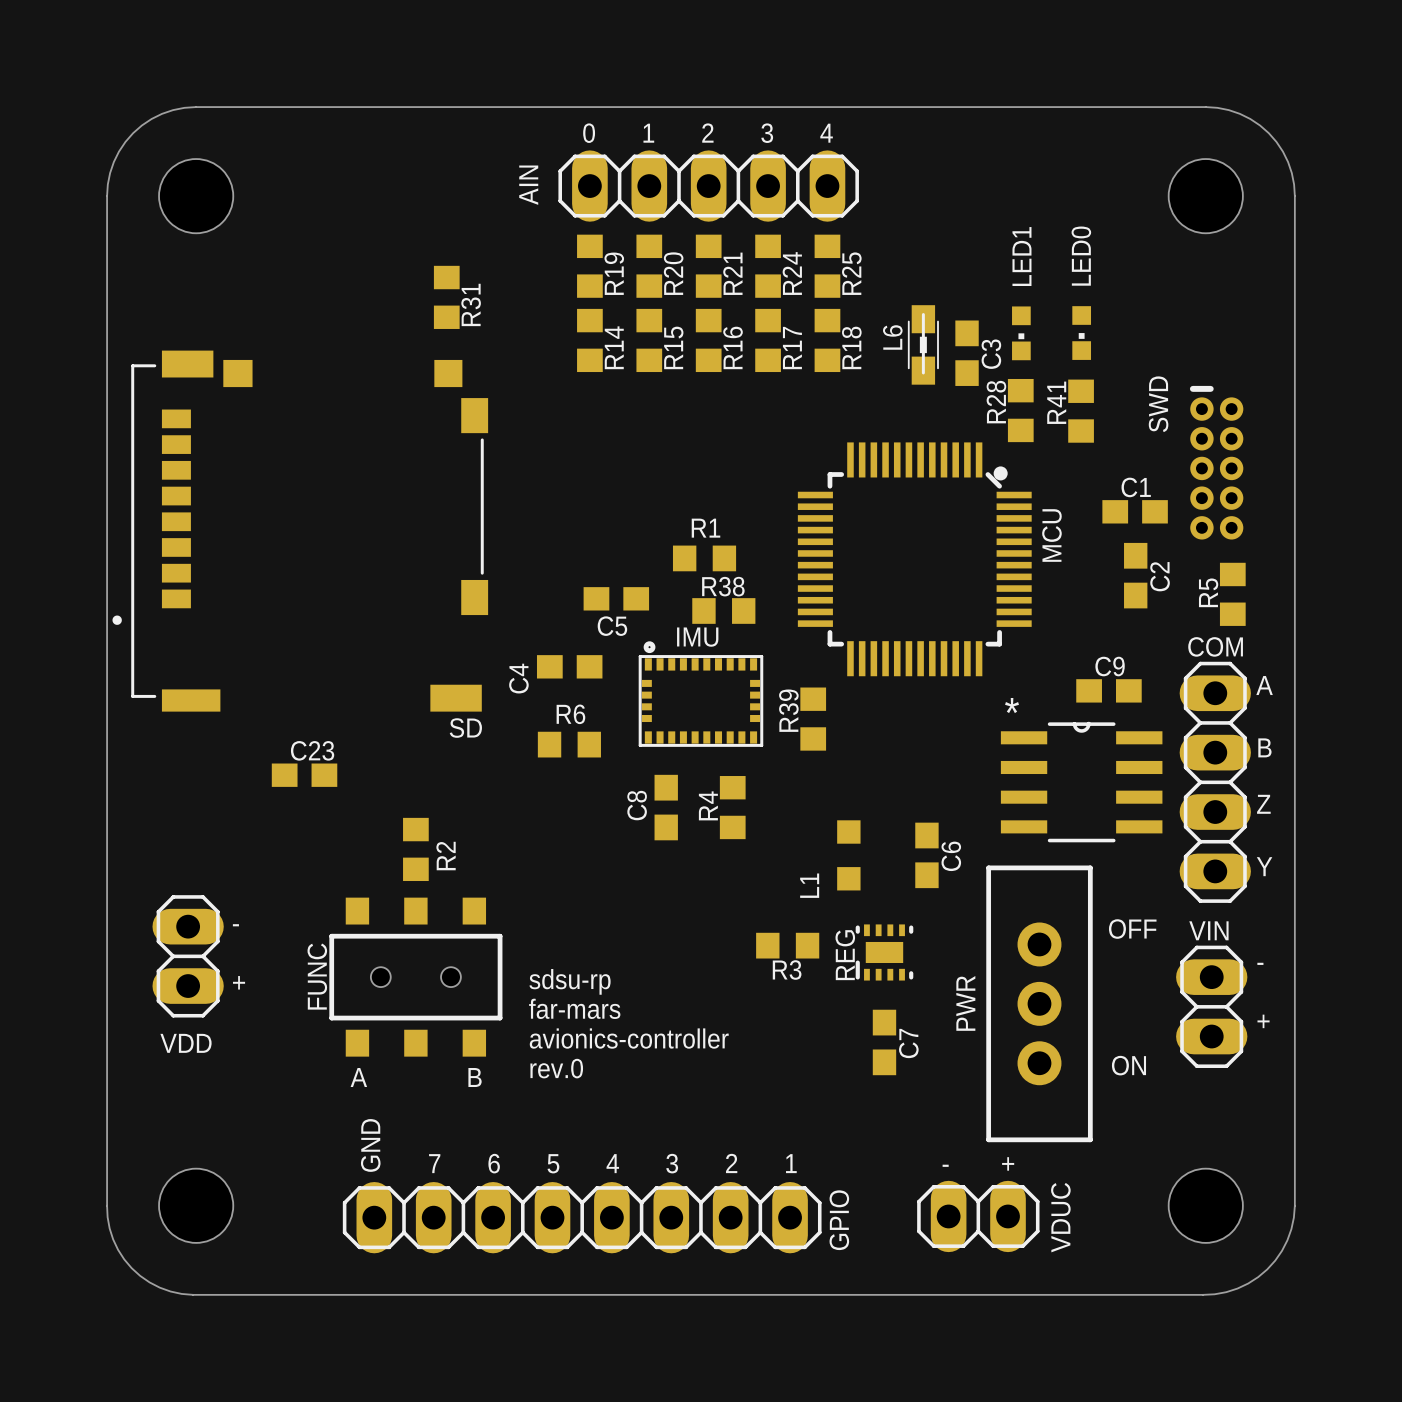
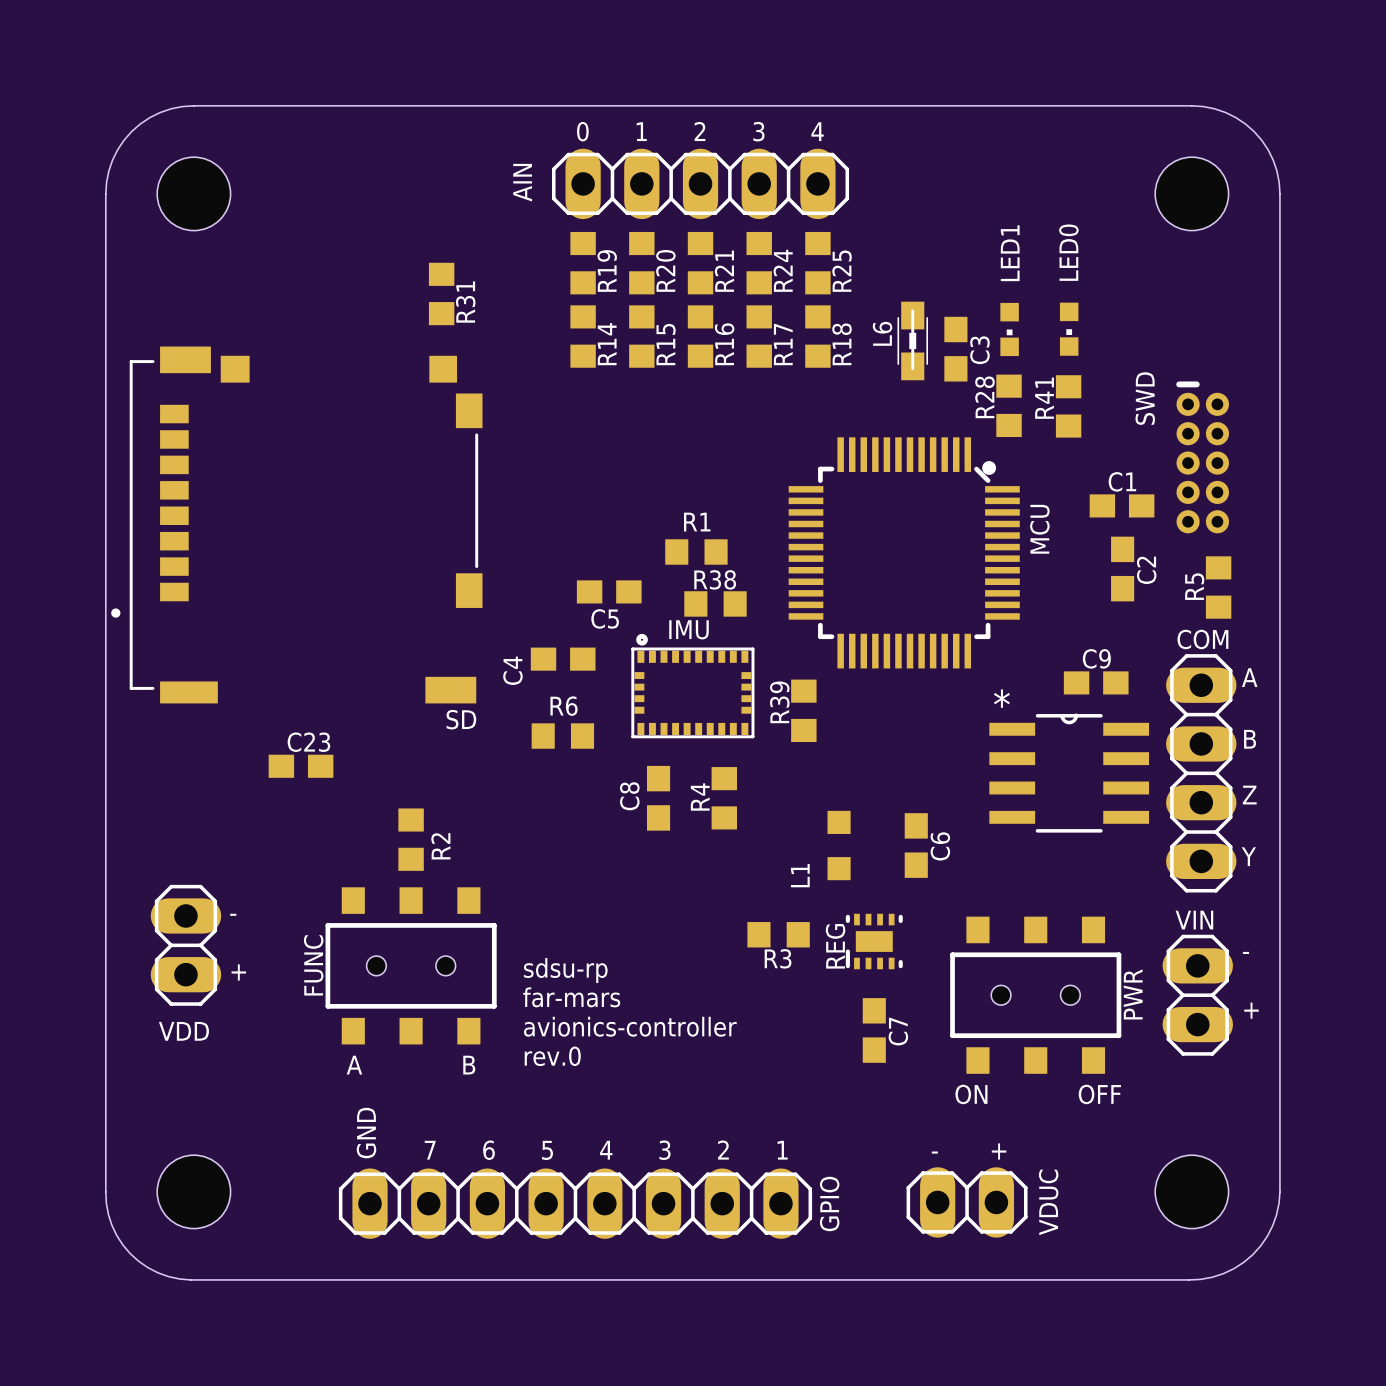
PWR footprint: [986, 865, 1093, 1143] -> [950, 916, 1122, 1074]
text position: OFF (1132, 929) -> OFF (1099, 1094)
PWR name position: PWR (965, 1003) -> PWR (1133, 994)
text position: ON (1128, 1065) -> ON (971, 1094)

